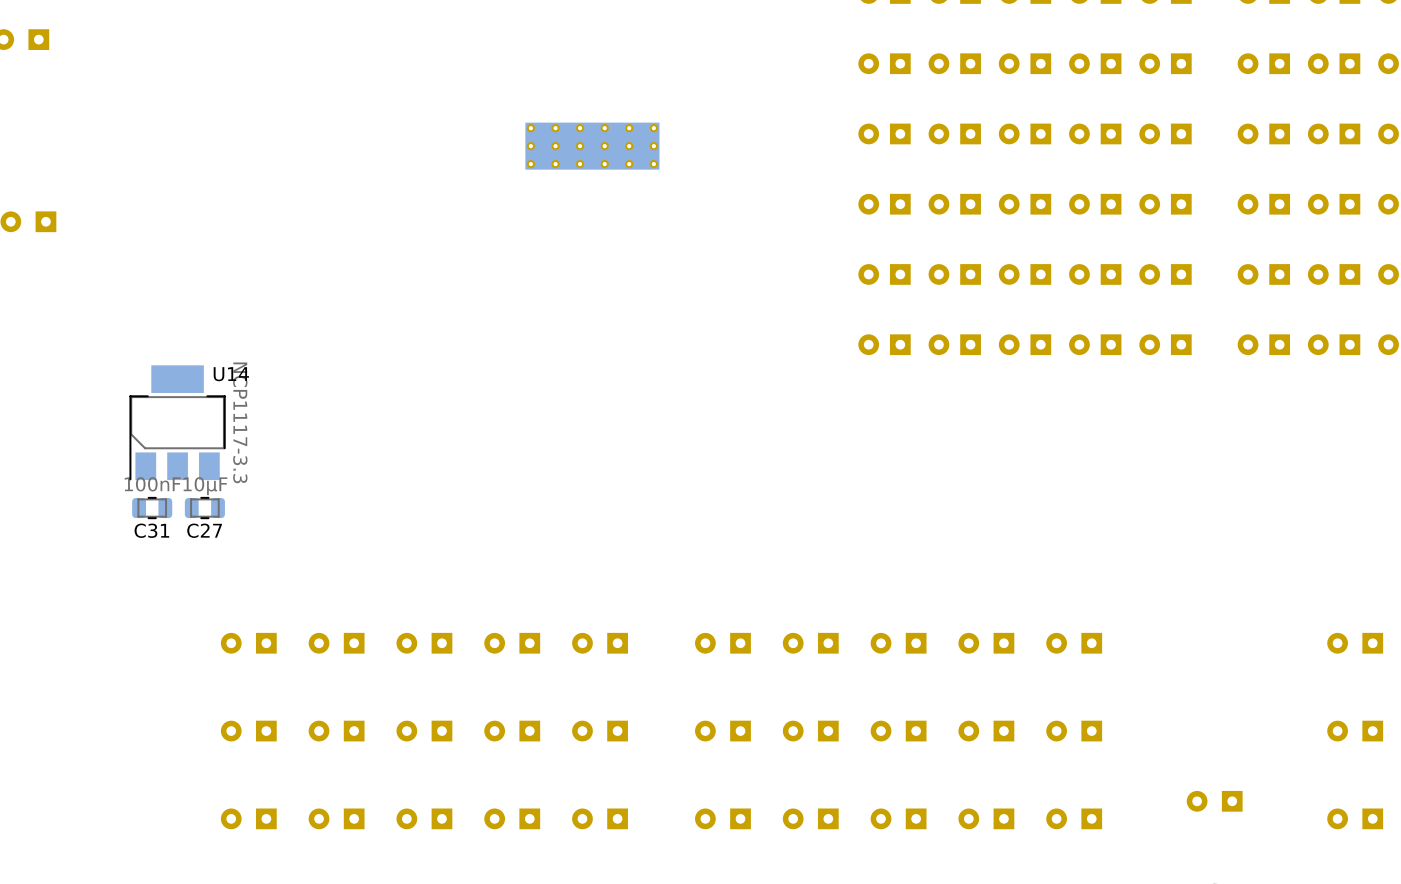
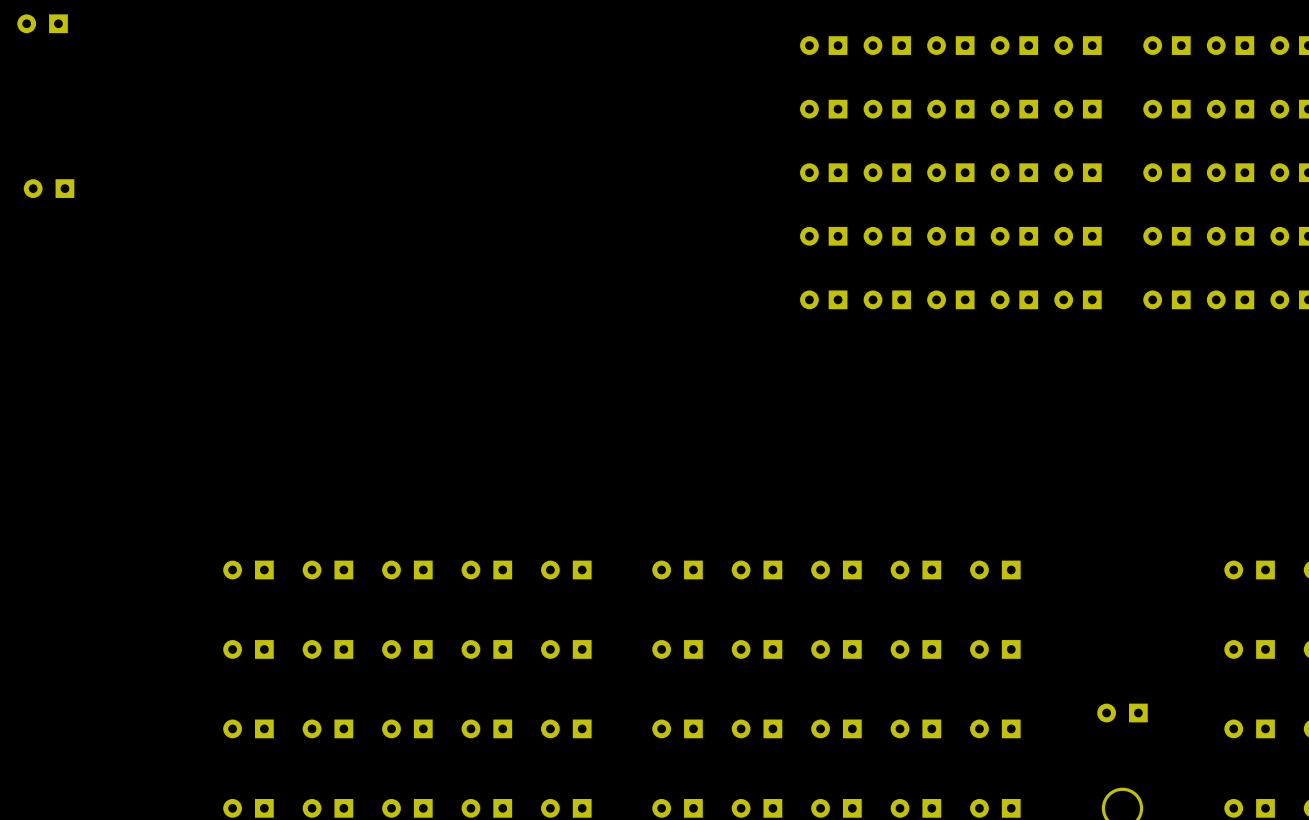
part: (592, 146) -> none
U14: NCP1117-3.3 (177, 422) -> none
C31: 100nF (152, 508) -> none
C27: 10µF (204, 508) -> none

